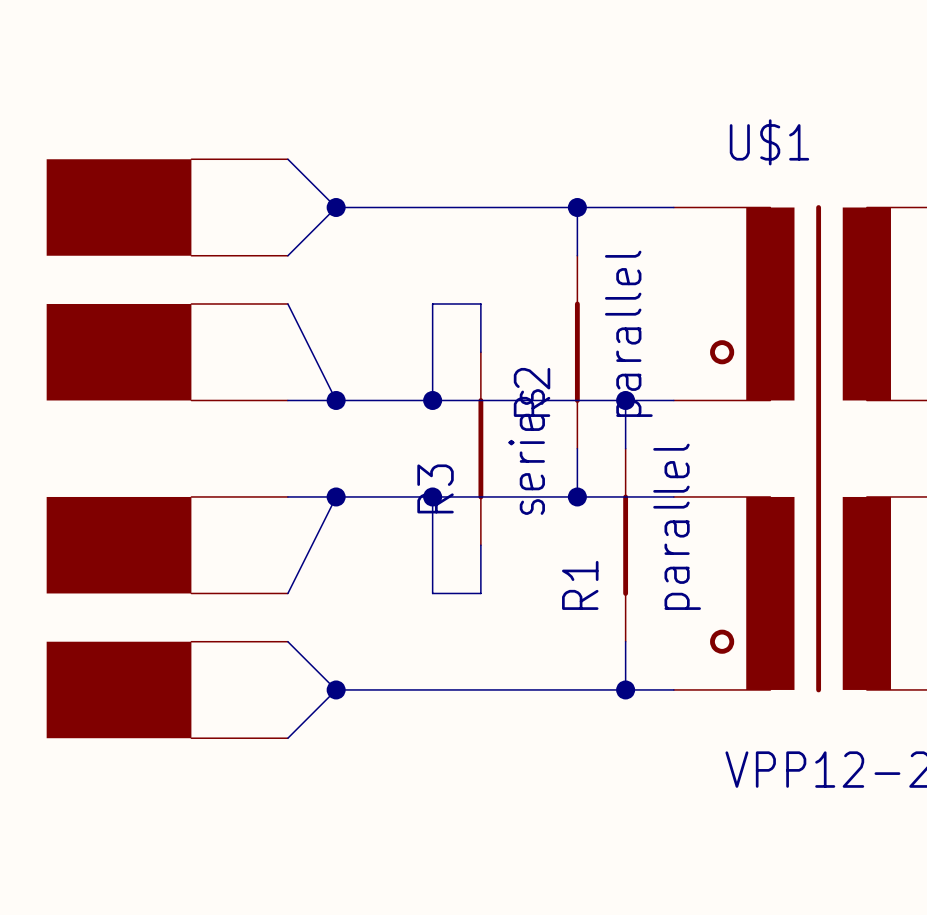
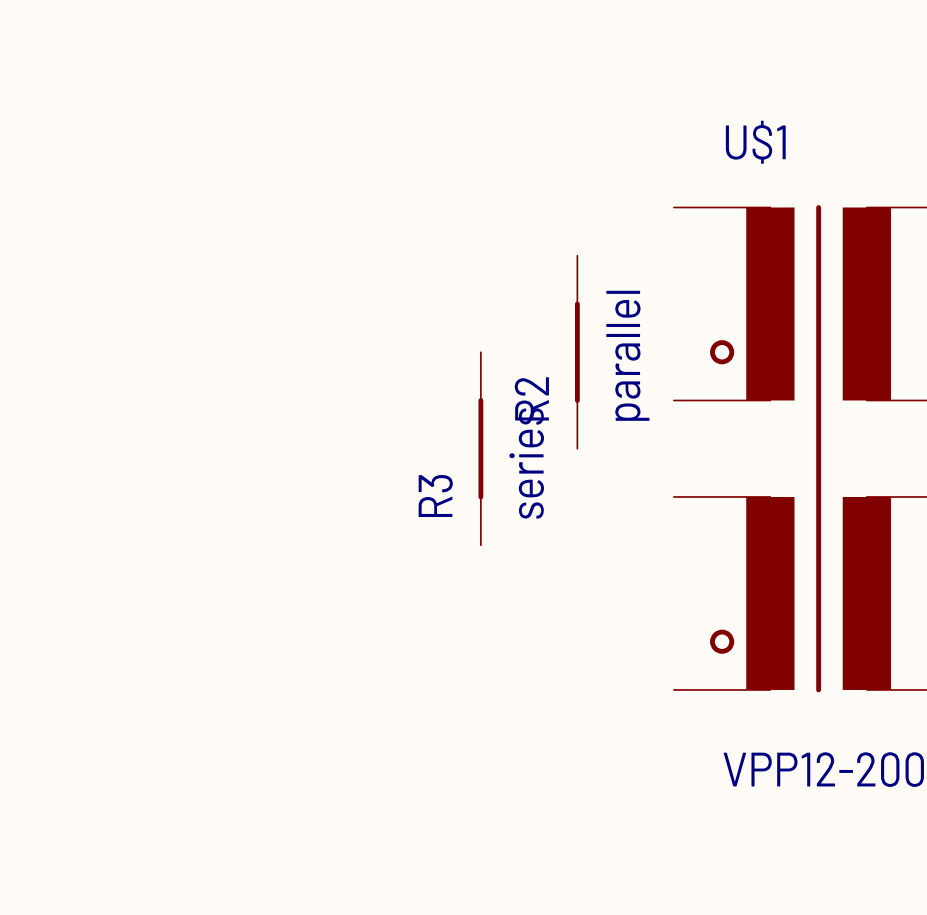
wire: (287, 159) (336, 207) -> none
part: (167, 207) -> none
wire: (336, 207) (673, 207) -> none
wire: (336, 207) (287, 255) -> none
junction: (336, 207) -> none
wire: (577, 207) (577, 255) -> none
junction: (577, 207) -> none
wire: (287, 303) (336, 400) -> none
part: (167, 352) -> none
wire: (480, 352) (480, 303) (432, 303) (432, 400) -> none
wire: (287, 400) (673, 400) -> none
junction: (336, 400) -> none
junction: (432, 400) -> none
wire: (625, 400) (625, 448) -> none
junction: (625, 400) -> none
wire: (577, 448) (577, 496) -> none
wire: (287, 496) (673, 496) -> none
wire: (336, 496) (287, 593) -> none
junction: (336, 496) -> none
wire: (432, 496) (432, 593) (480, 593) (480, 545) -> none
junction: (432, 496) -> none
junction: (577, 496) -> none
part: (167, 545) -> none
R1: parallel (625, 545) -> none
wire: (287, 641) (336, 689) -> none
wire: (625, 641) (625, 689) -> none
part: (167, 689) -> none
wire: (336, 689) (673, 689) -> none
wire: (336, 689) (287, 738) -> none
junction: (336, 689) -> none
junction: (625, 689) -> none

